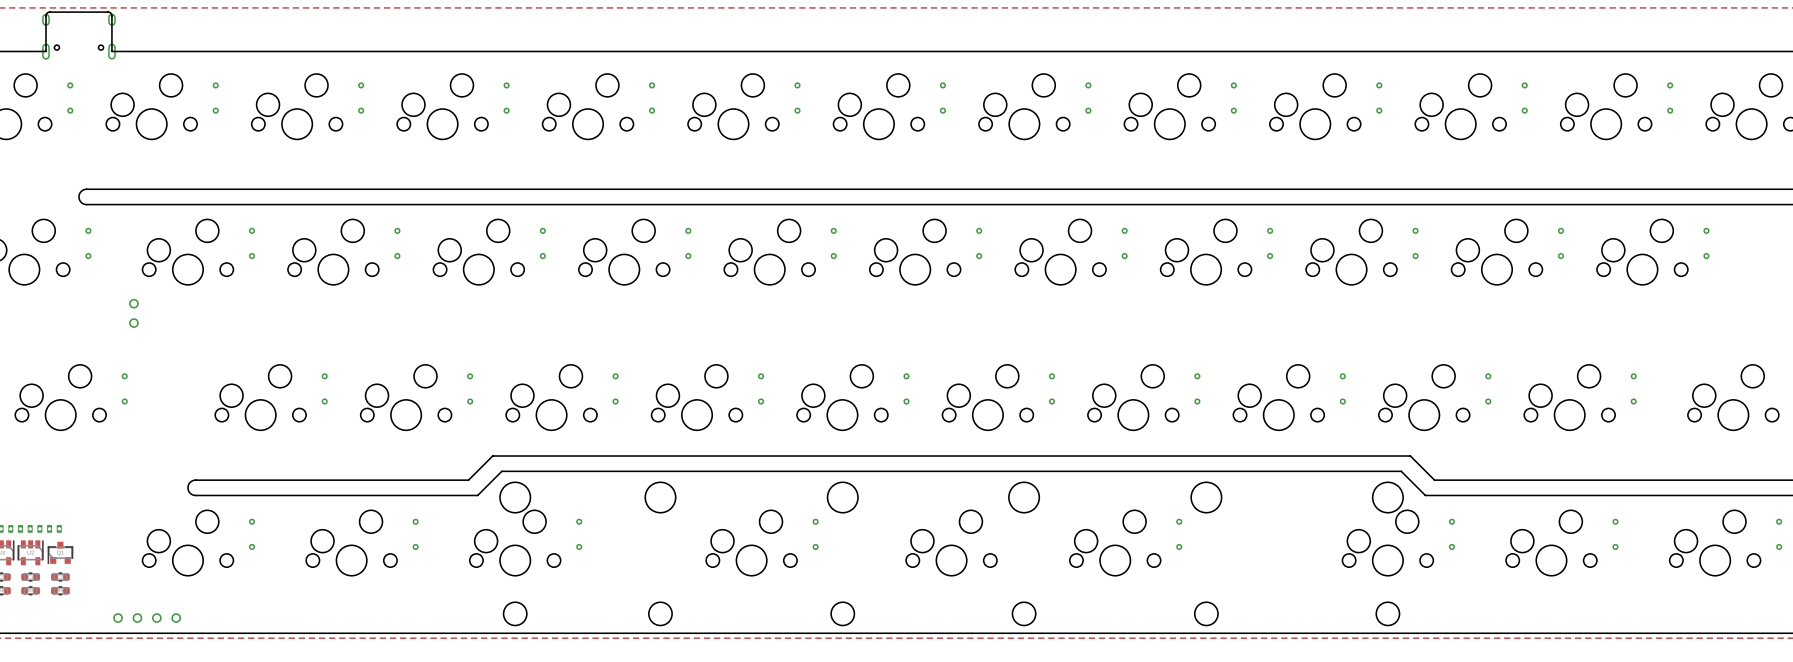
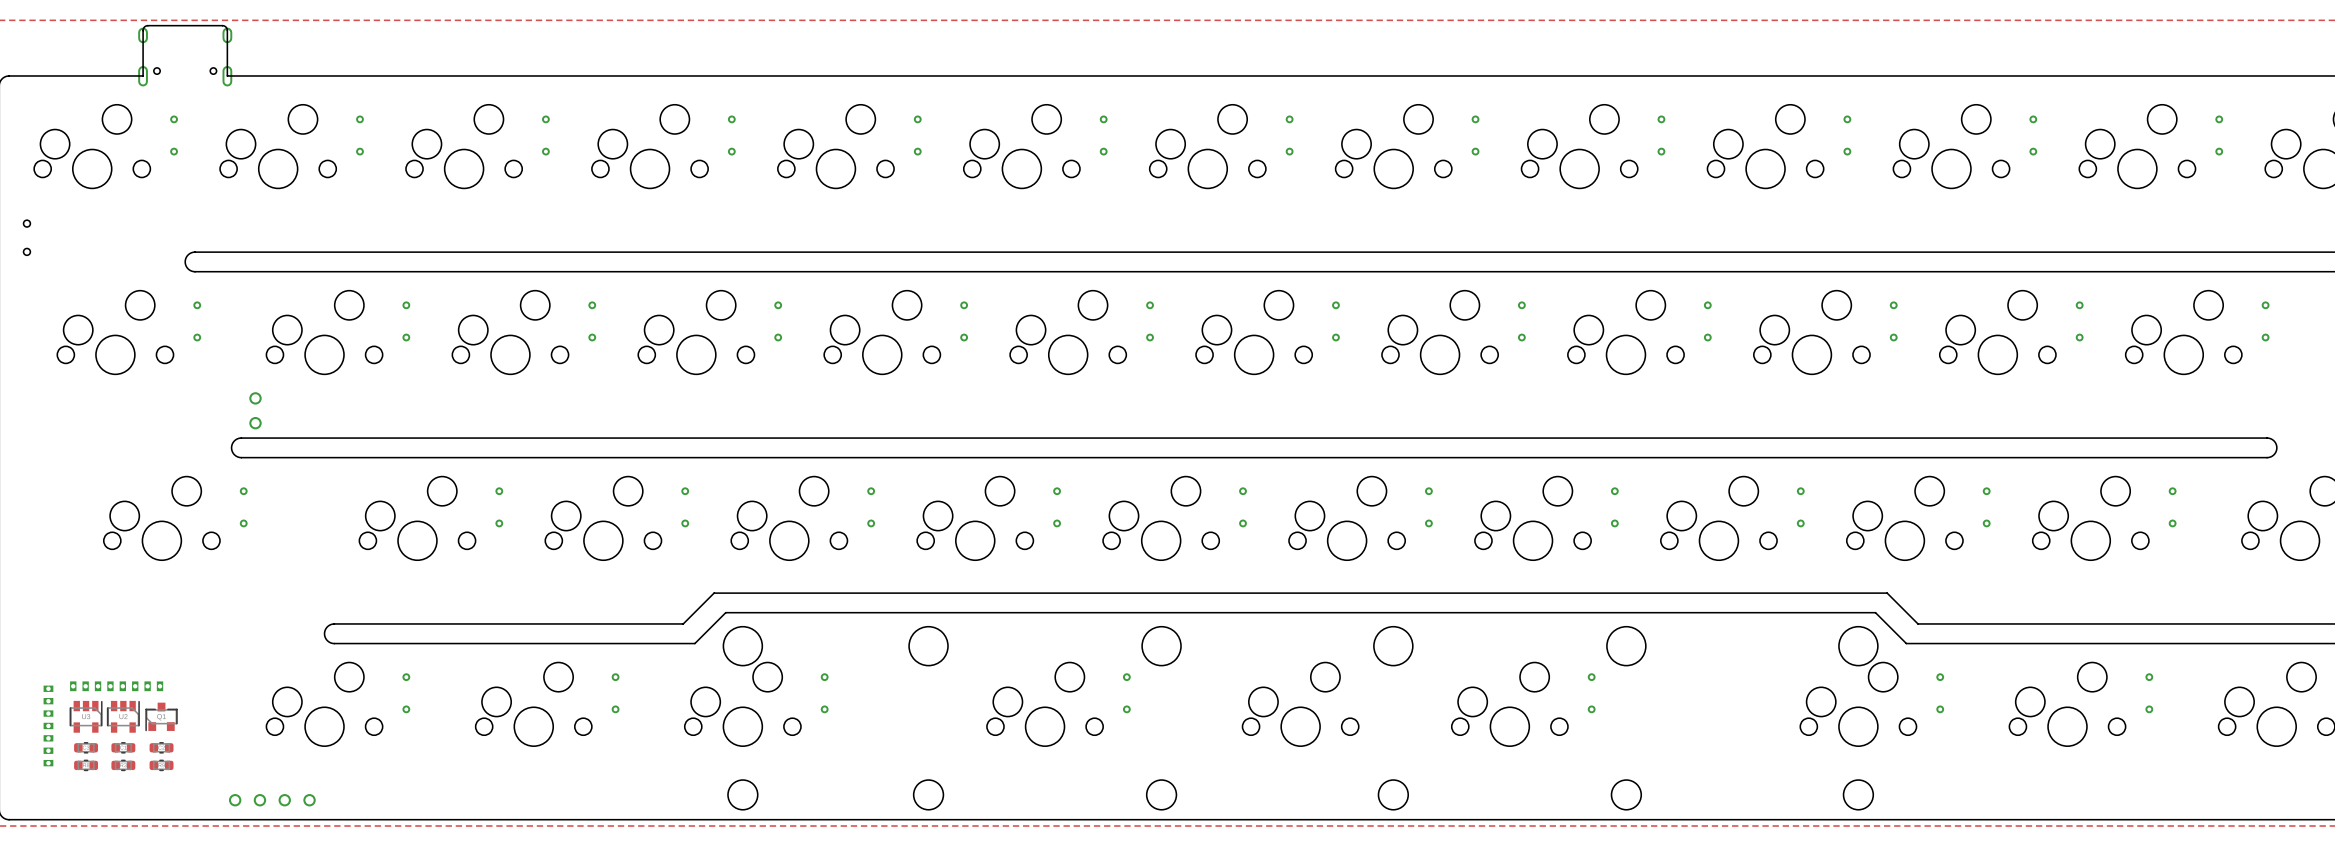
board edge: none -> (241, 438) (2267, 438) (2273, 440) (2276, 447) (2273, 454) (2267, 457) (241, 457) (234, 454) (231, 447) (234, 440) (241, 438)

